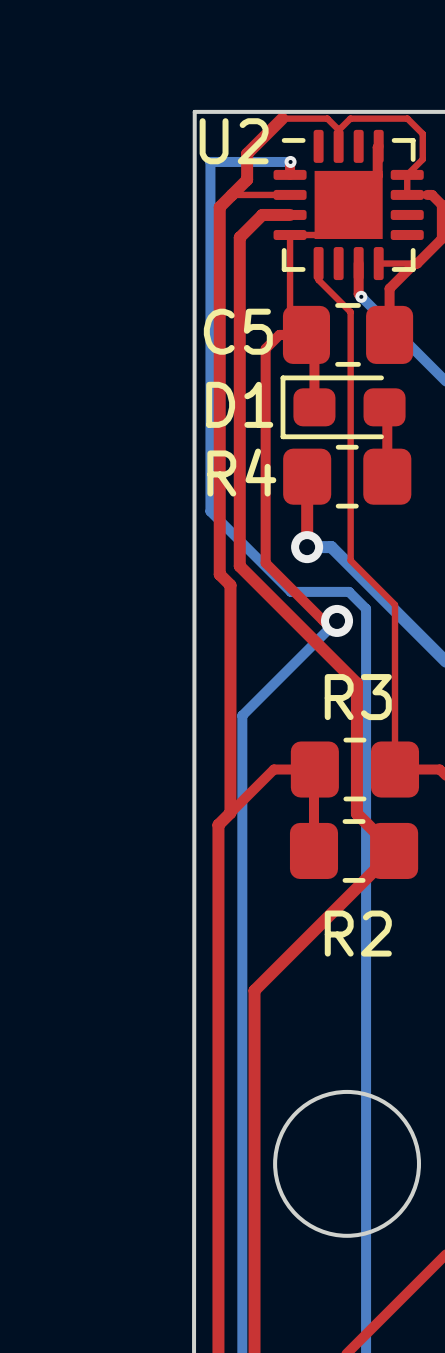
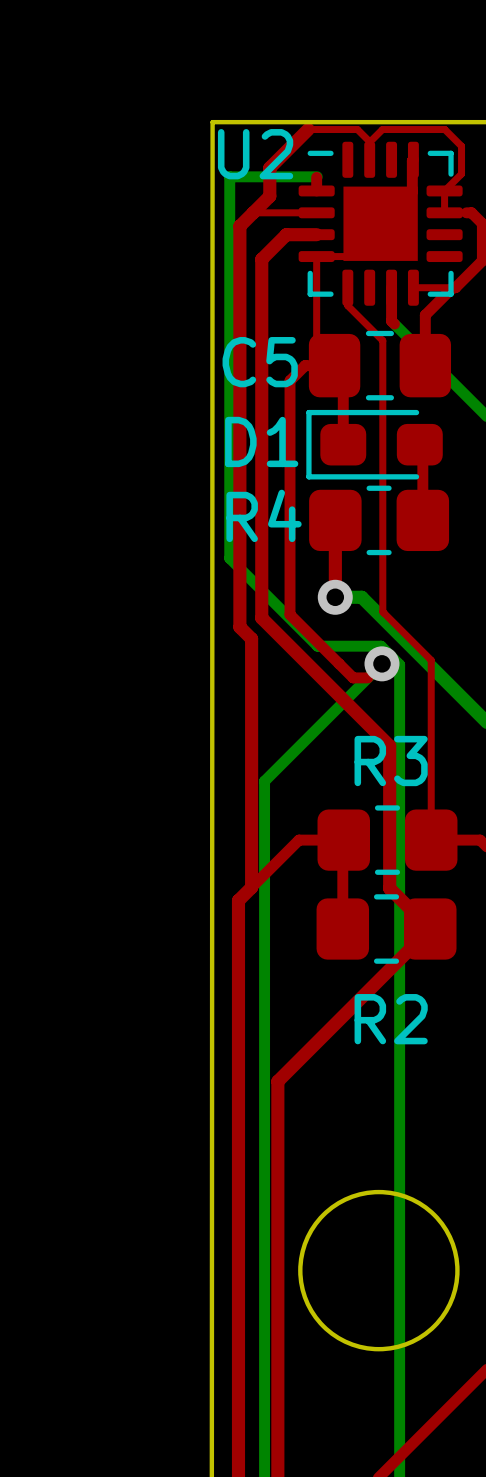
via: (290, 161) -> none
via: (361, 296) -> none
via position: (337, 620) -> (381, 663)

